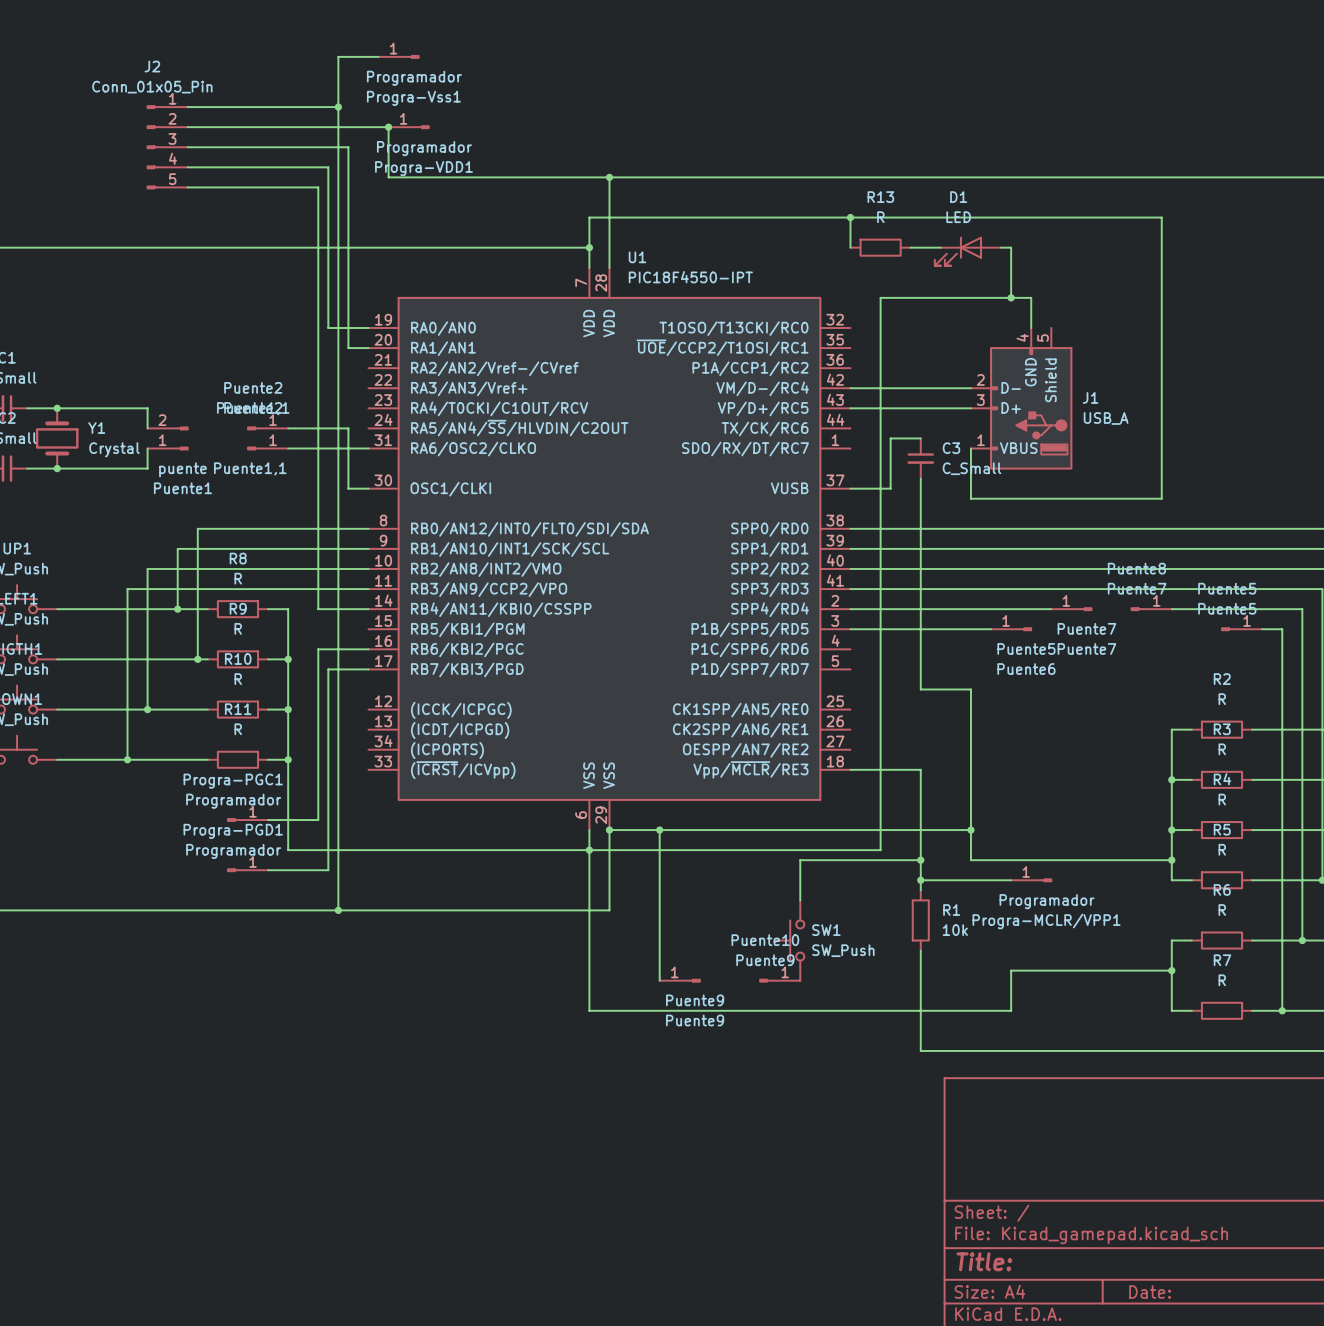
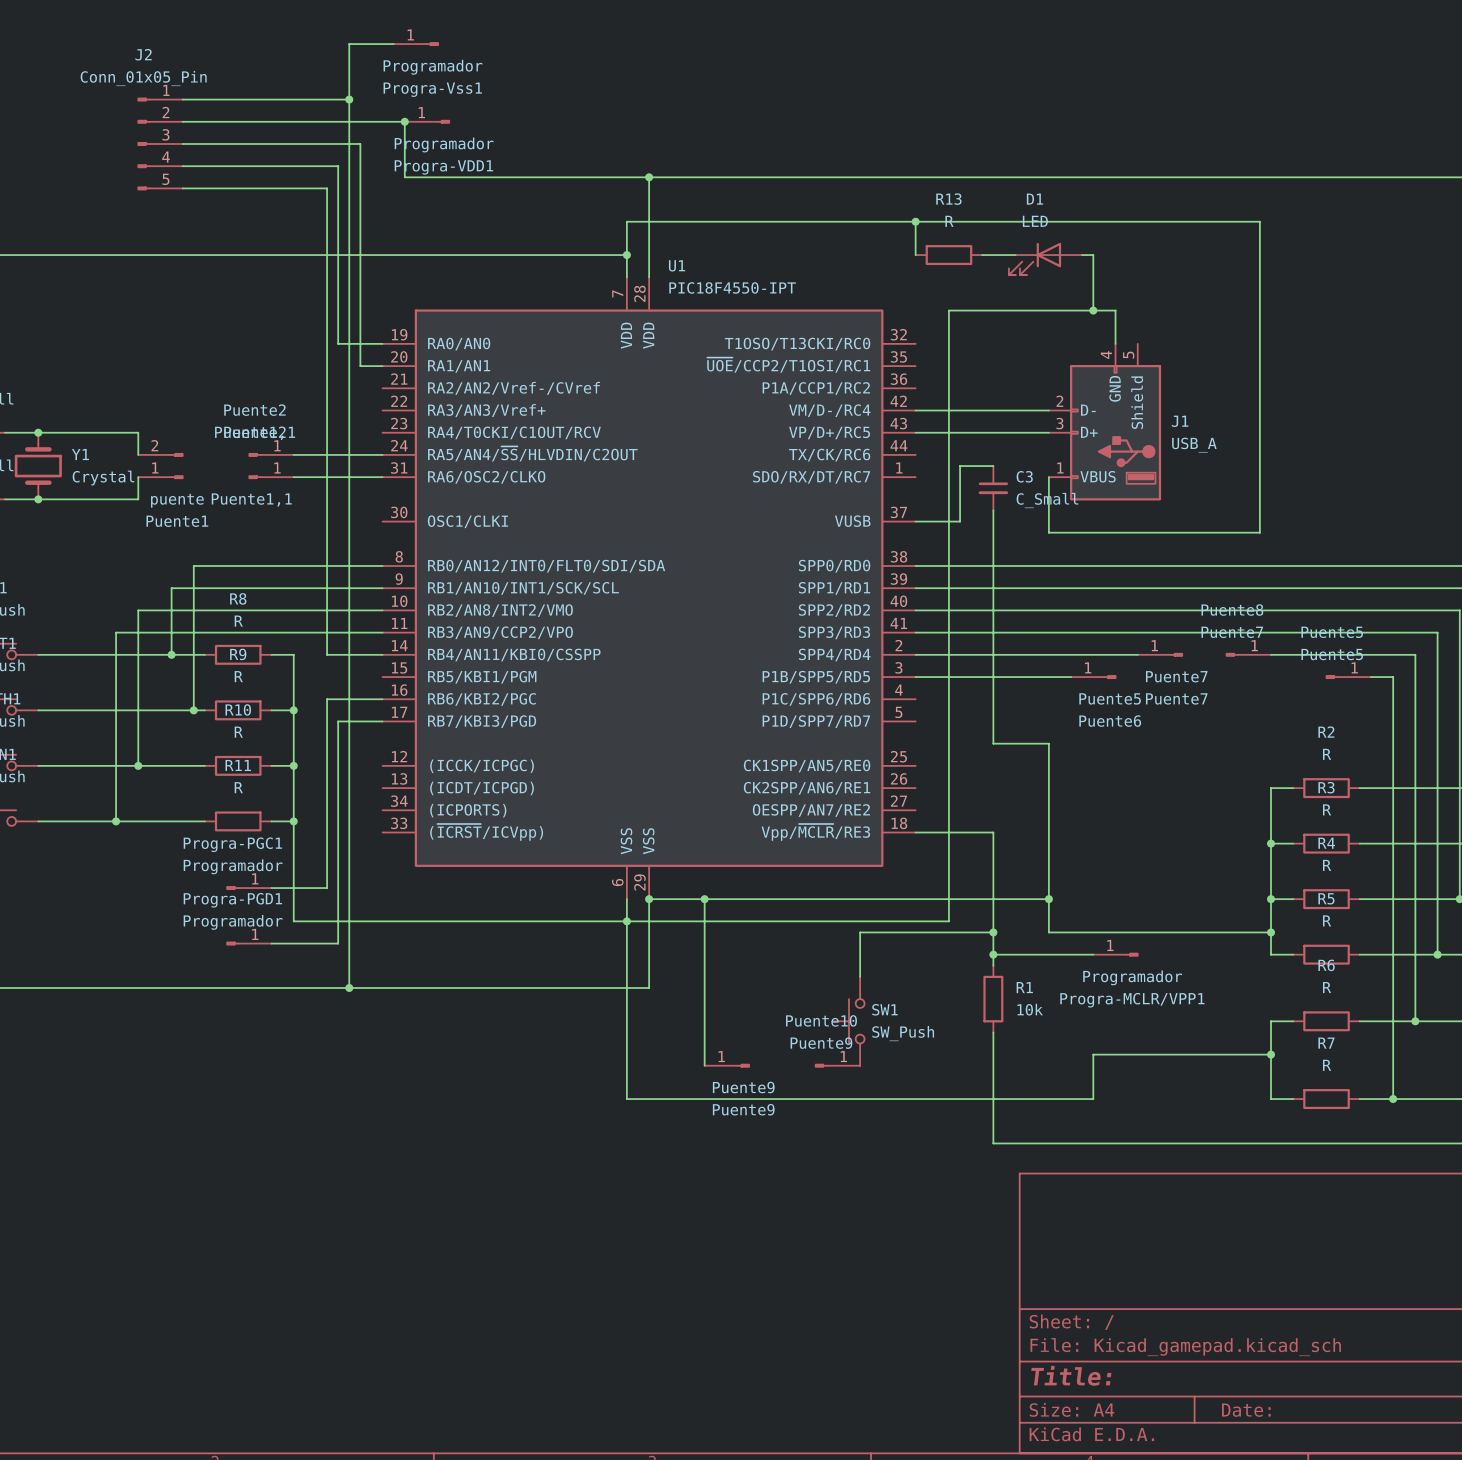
wire: (348, 428) (348, 488) (368, 488) -> (360, 454) (382, 454)

